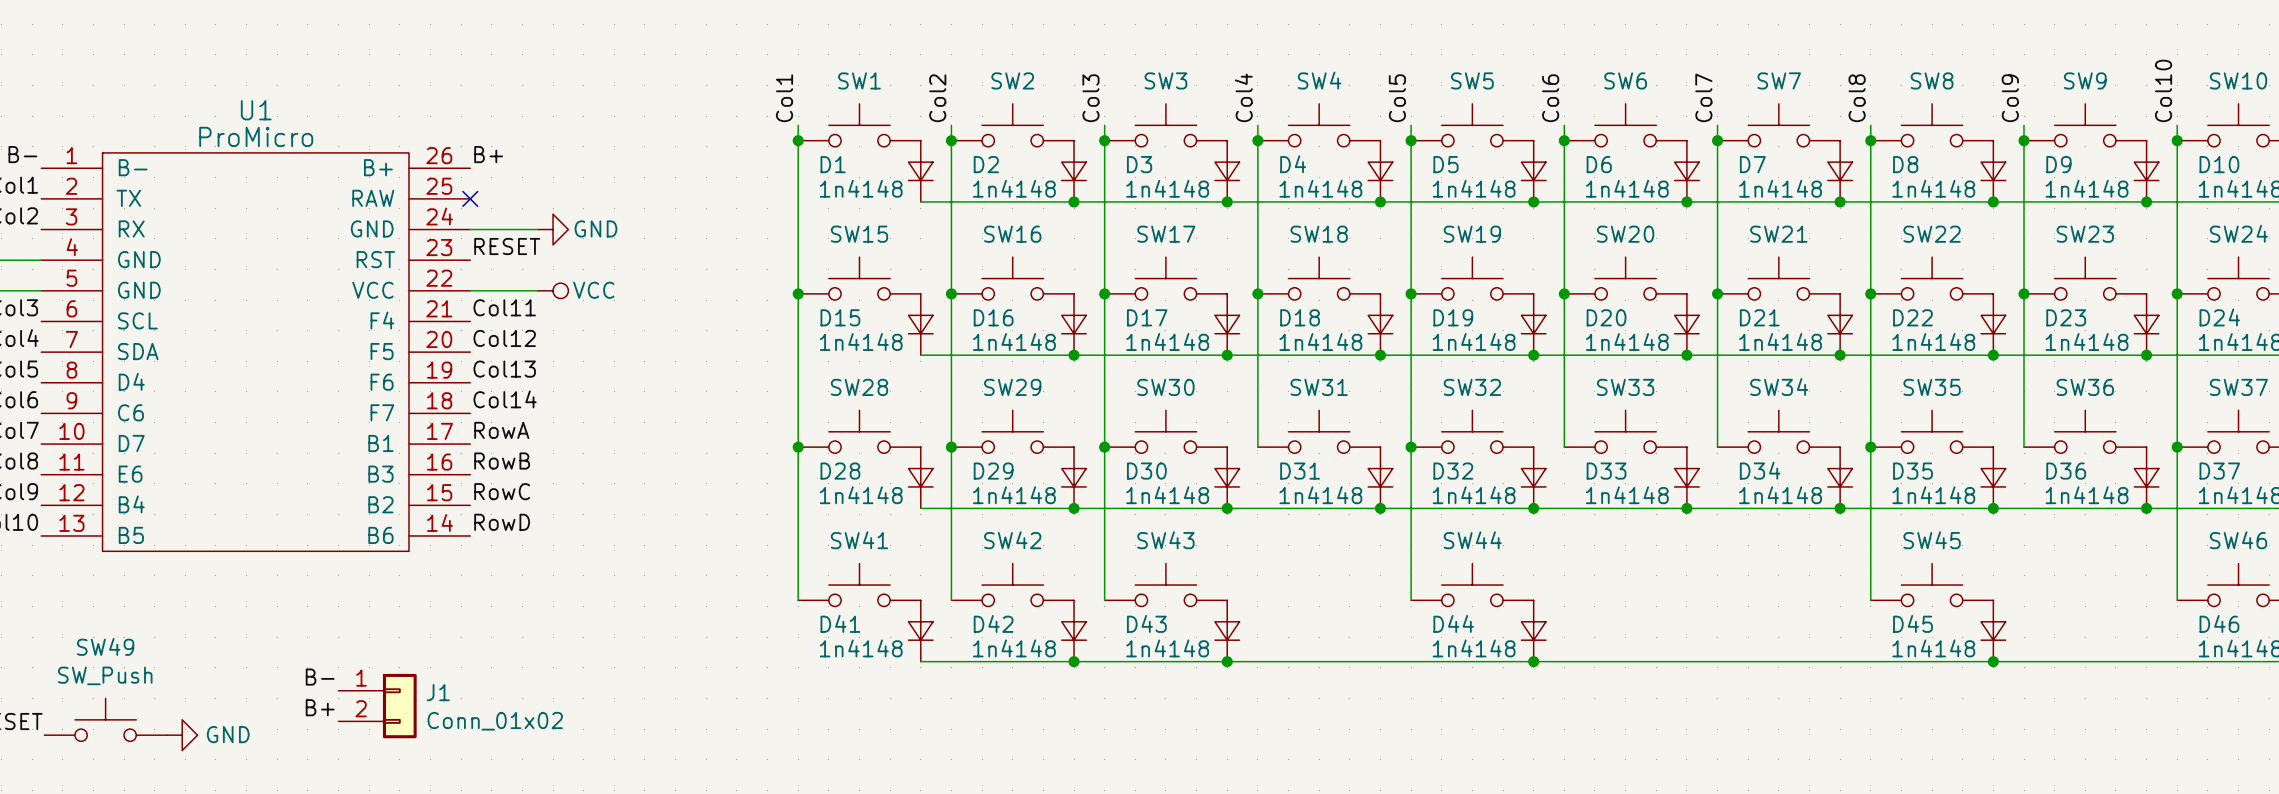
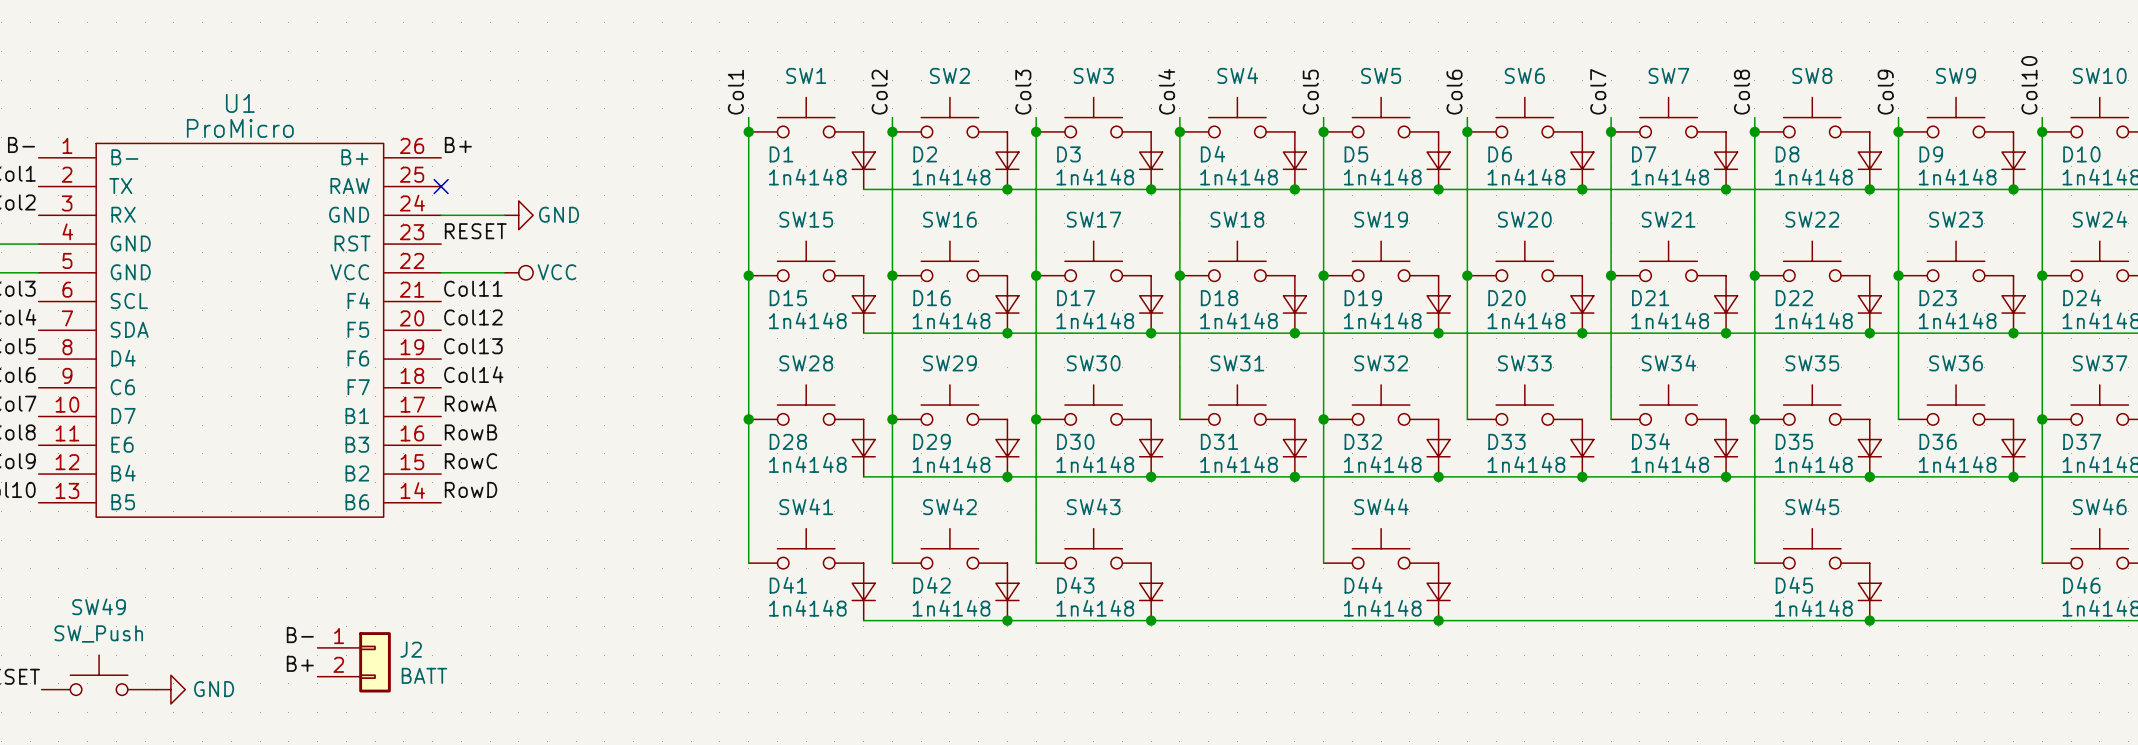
J1 name: J1 (438, 692) -> J2 (411, 649)
J1 value: Conn_01x02 (495, 721) -> BATT (424, 675)

